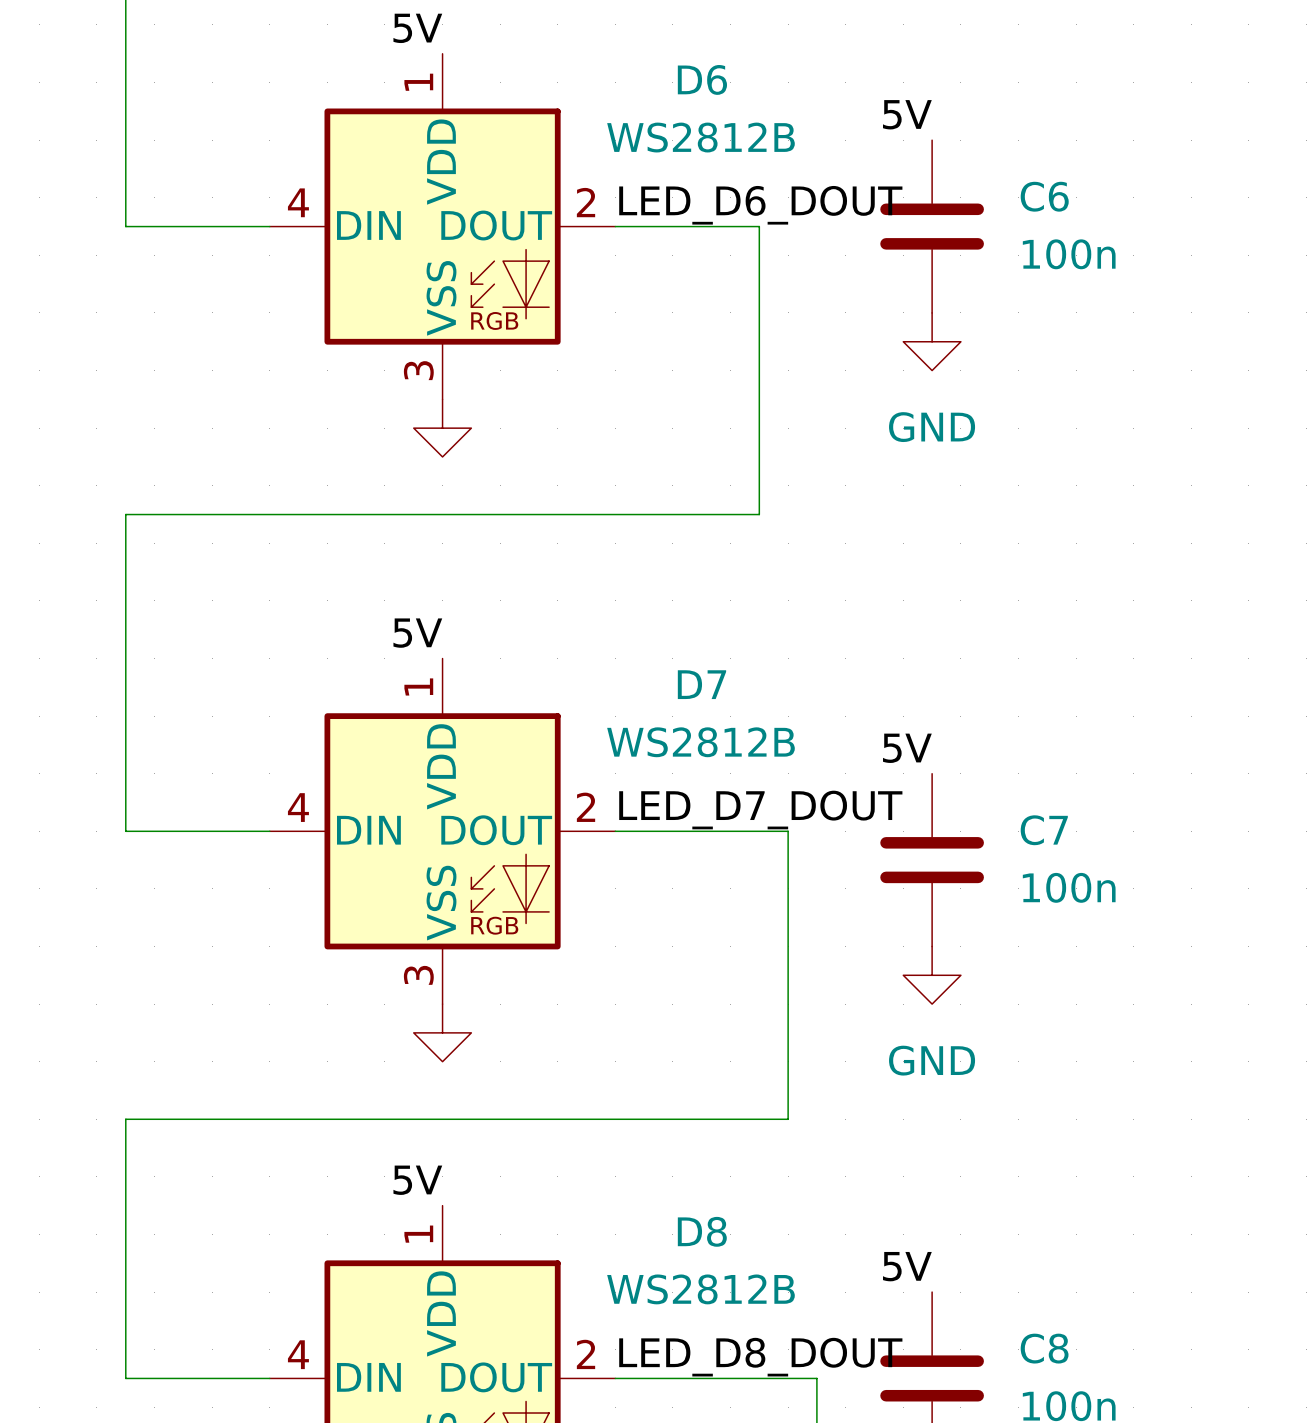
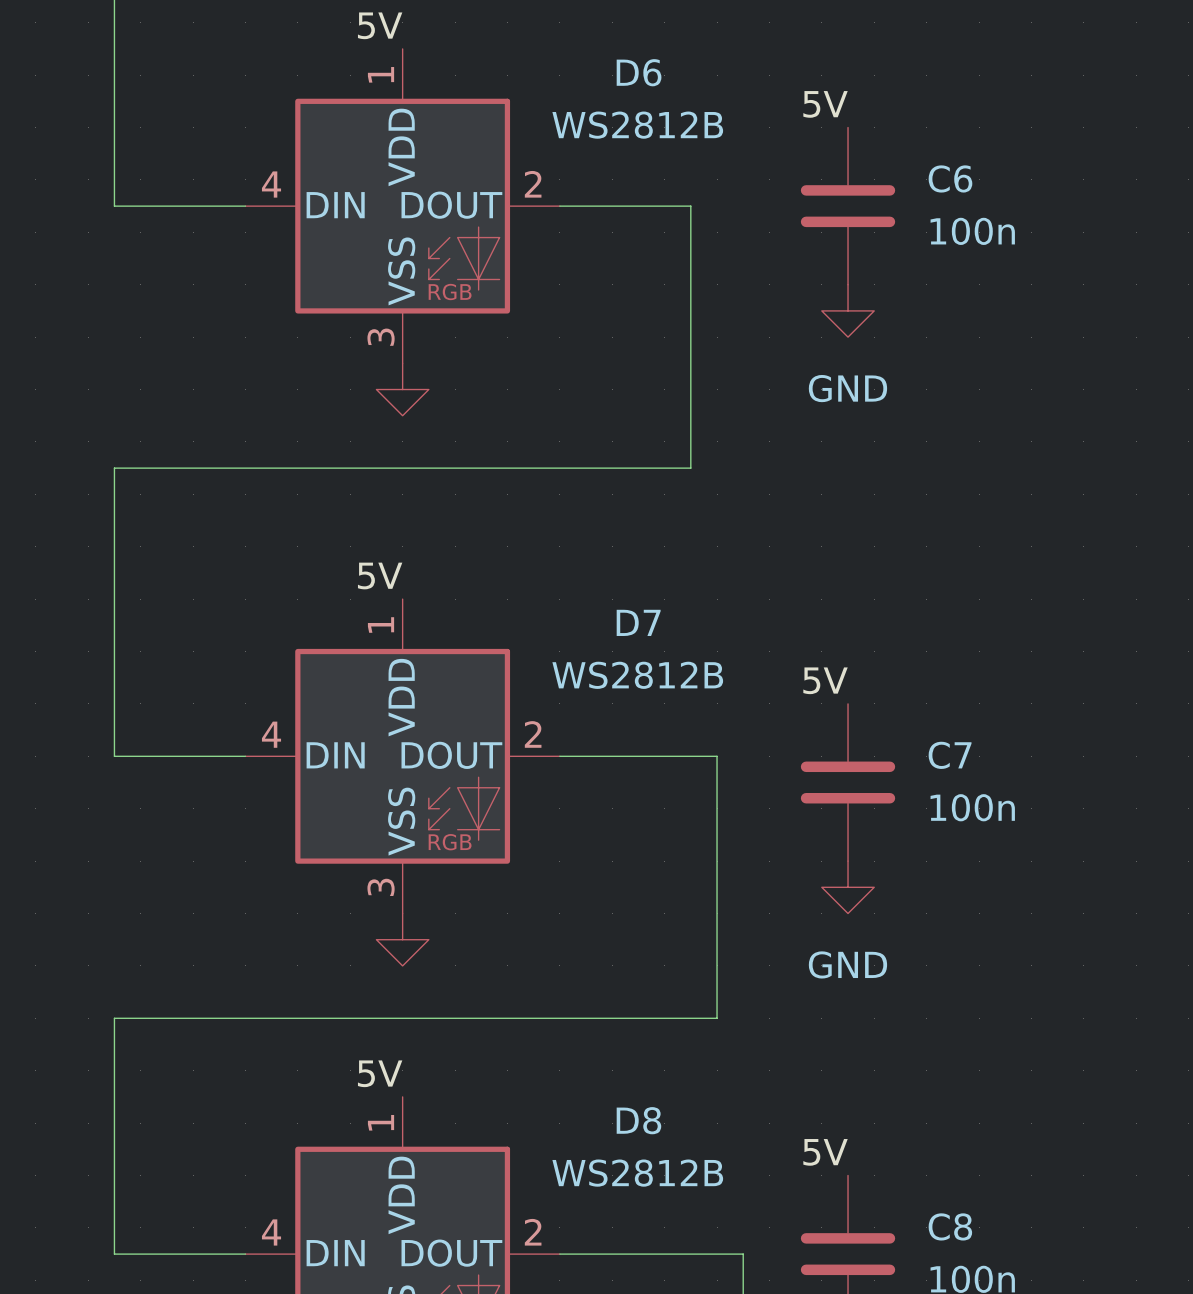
label: LED_D6_DOUT (760, 205) -> none
label: LED_D7_DOUT (760, 810) -> none
label: LED_D8_DOUT (760, 1357) -> none

